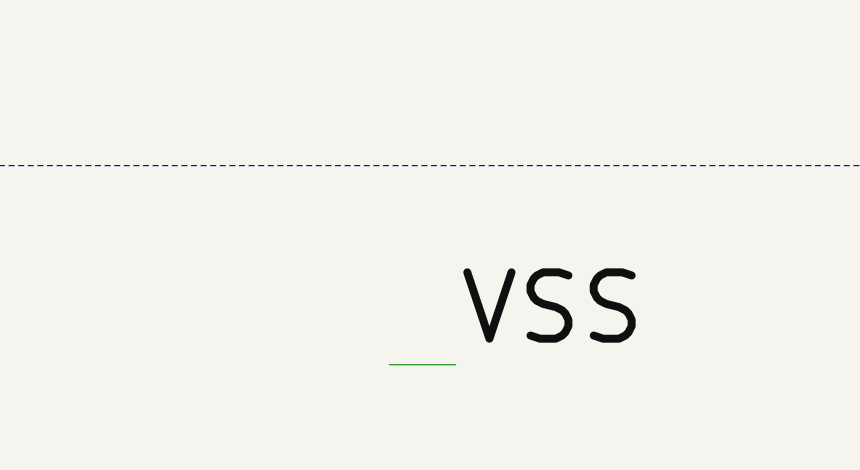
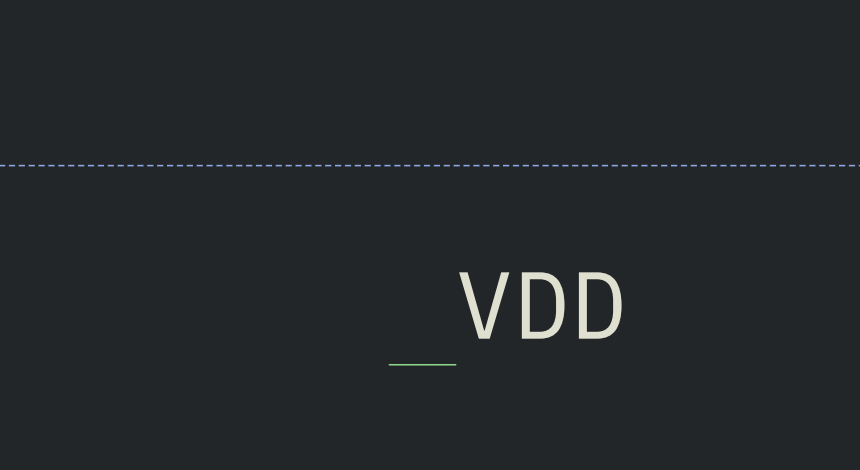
label: VSS (549, 305) -> VDD (540, 305)

